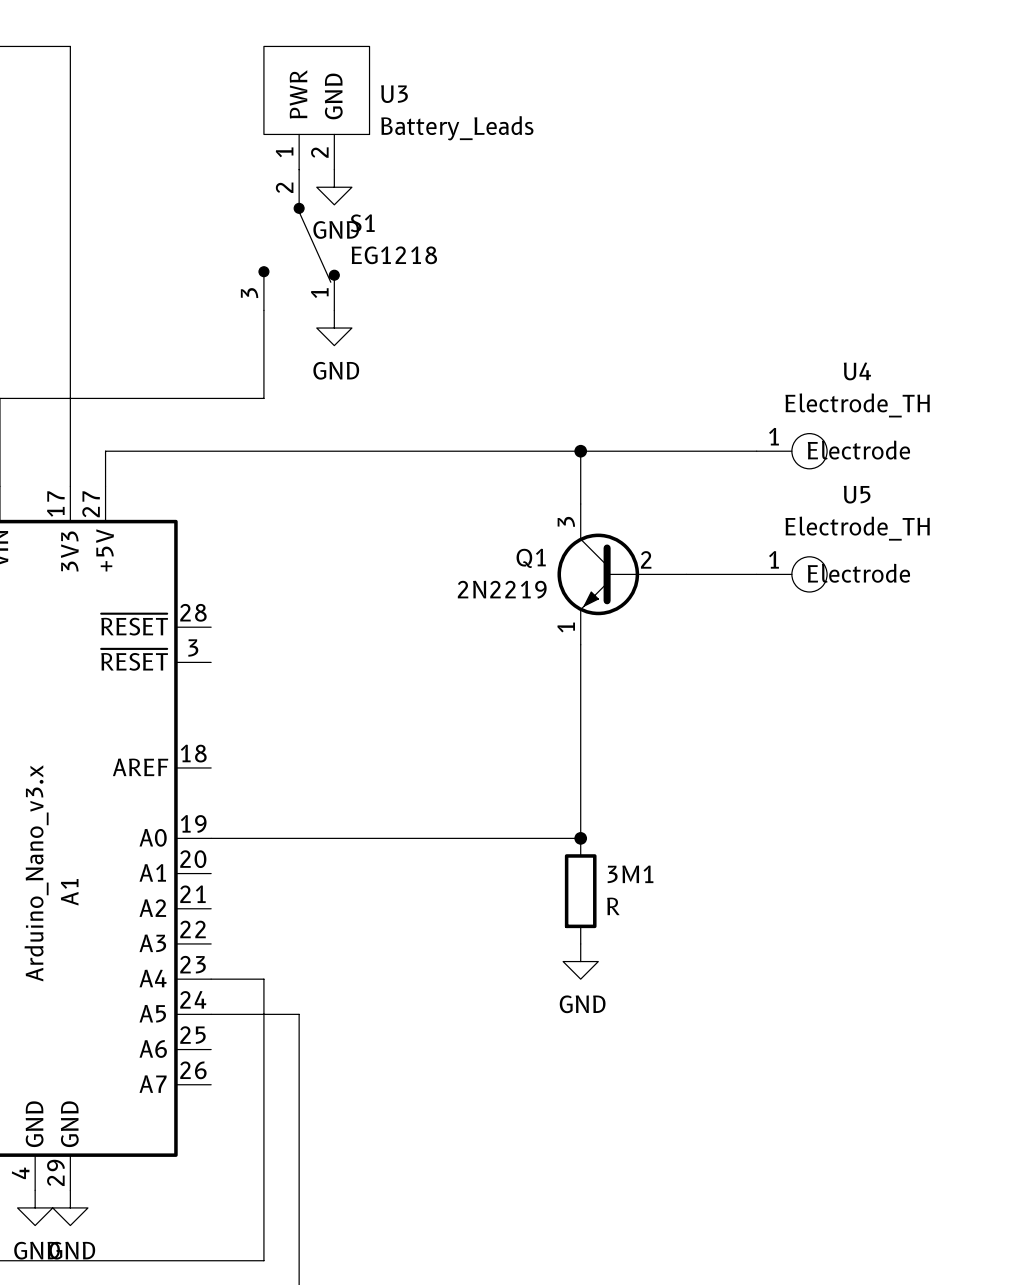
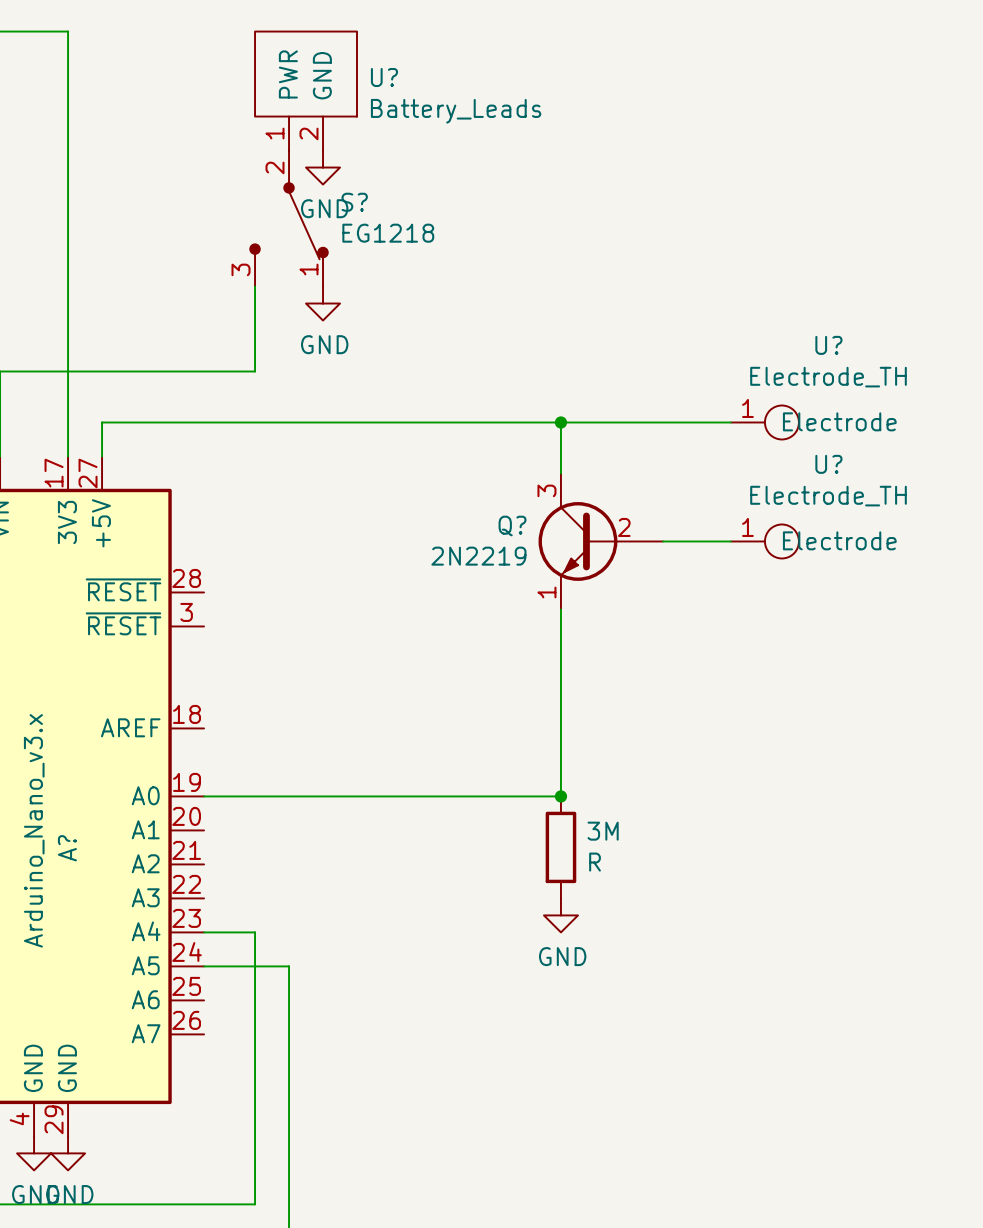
U3 name: U3 (394, 94) -> U? (384, 77)
S1 name: S1 (362, 223) -> S? (354, 202)
U4 name: U4 (857, 371) -> U? (828, 345)
U5 name: U5 (857, 494) -> U? (828, 464)
Q1 name: Q1 (531, 558) -> Q? (512, 526)
3M1 name: 3M1 (630, 874) -> 3M (603, 831)
A1 name: A1 (69, 892) -> A? (67, 848)

